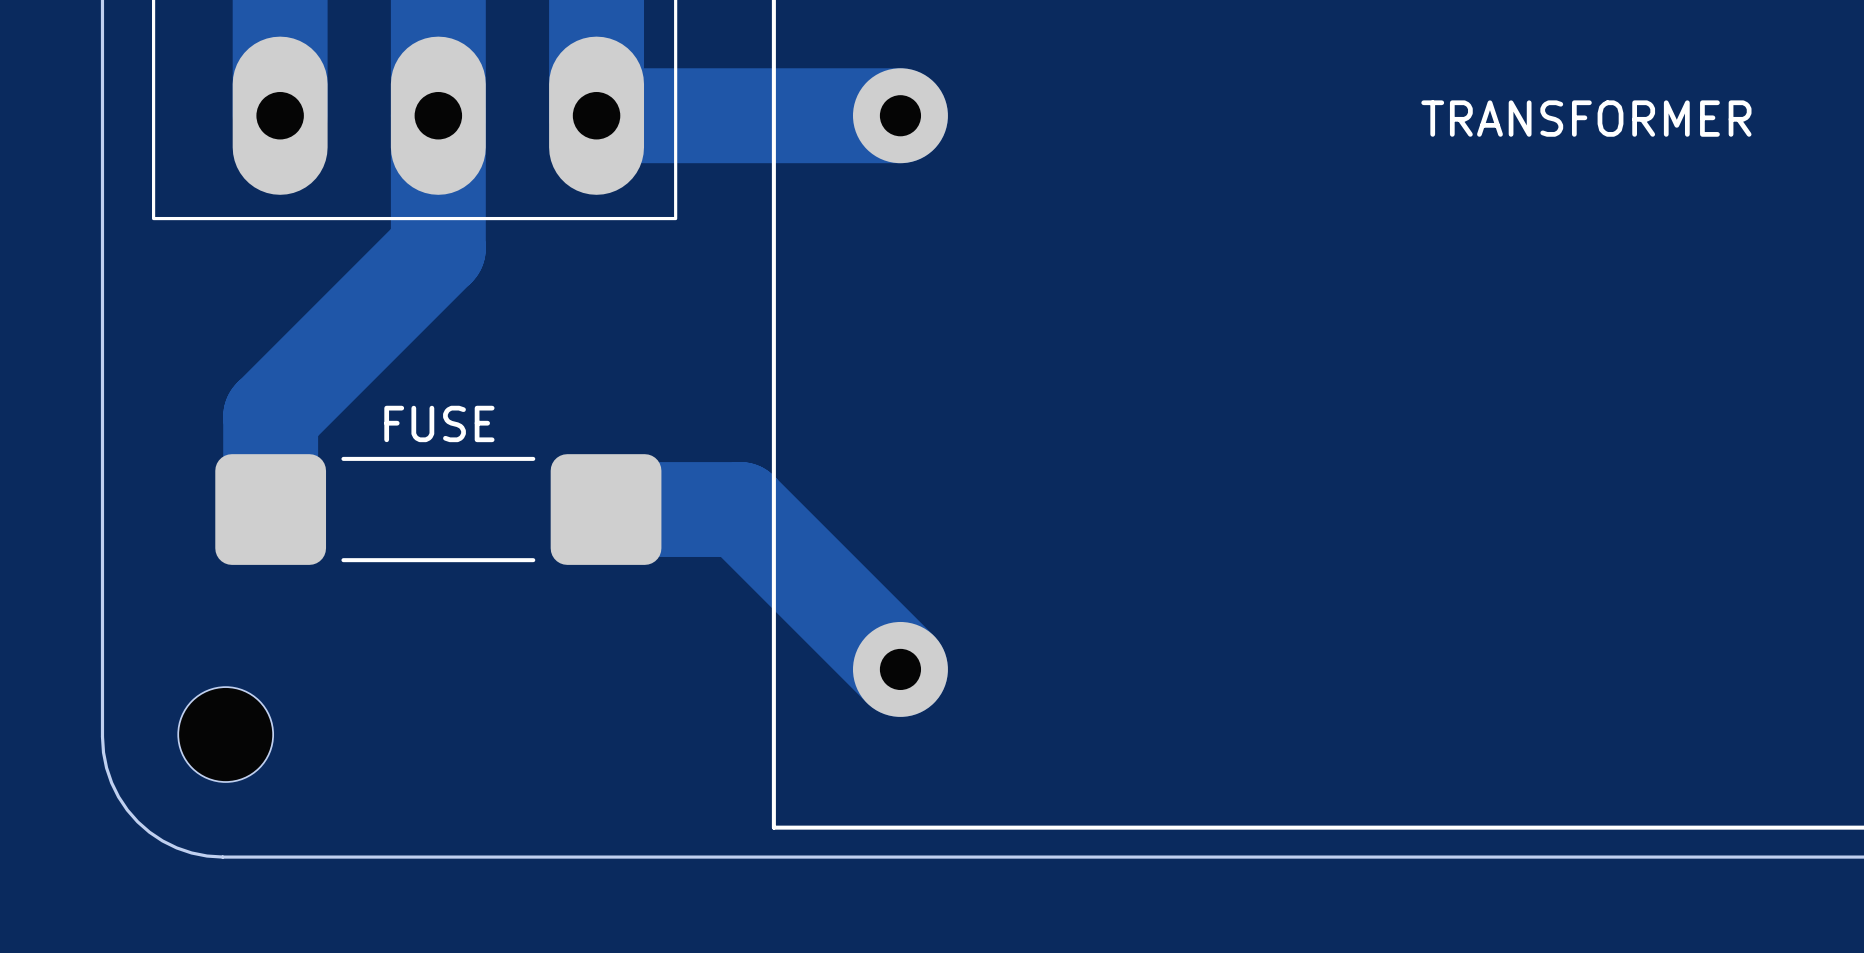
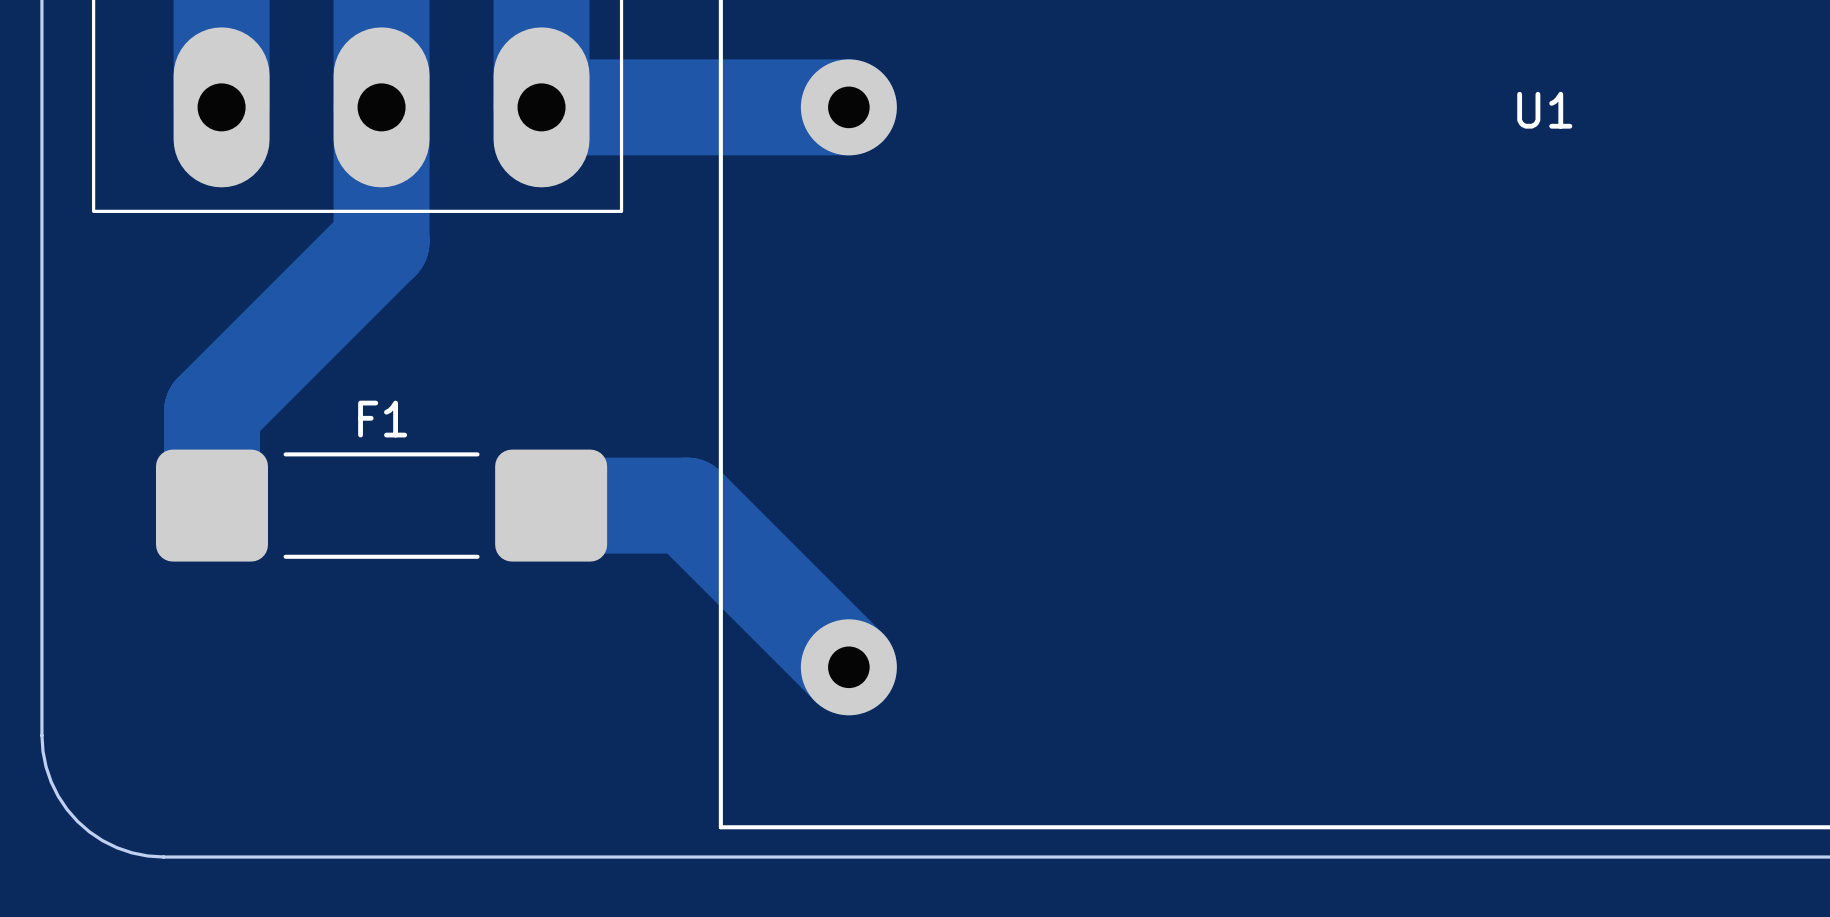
TRANSFORMER name: TRANSFORMER (1586, 118) -> U1 (1544, 110)
FUSE name: FUSE (439, 423) -> F1 (382, 419)
part: (225, 734) -> none

